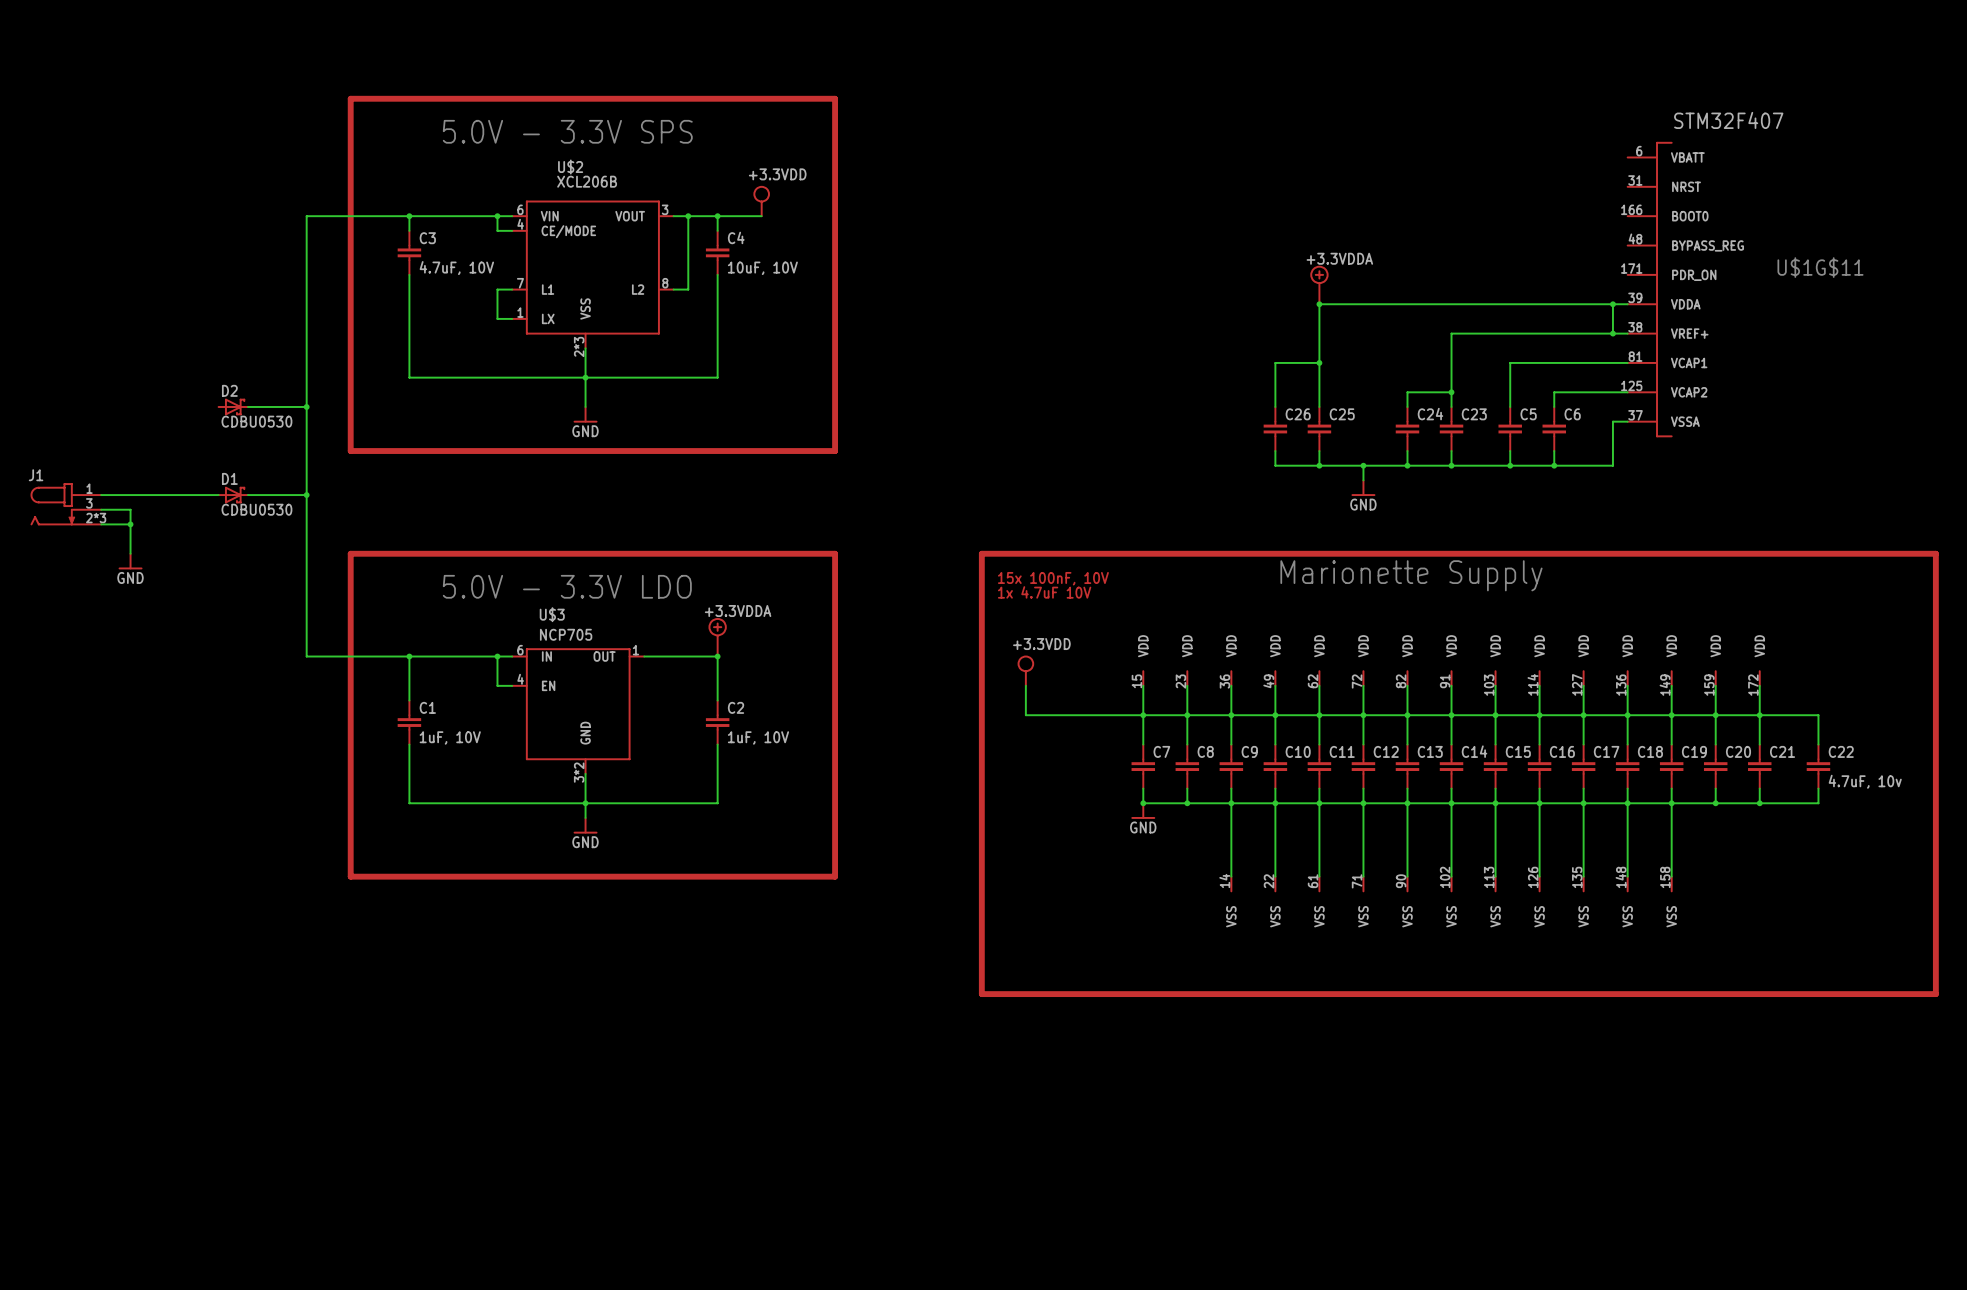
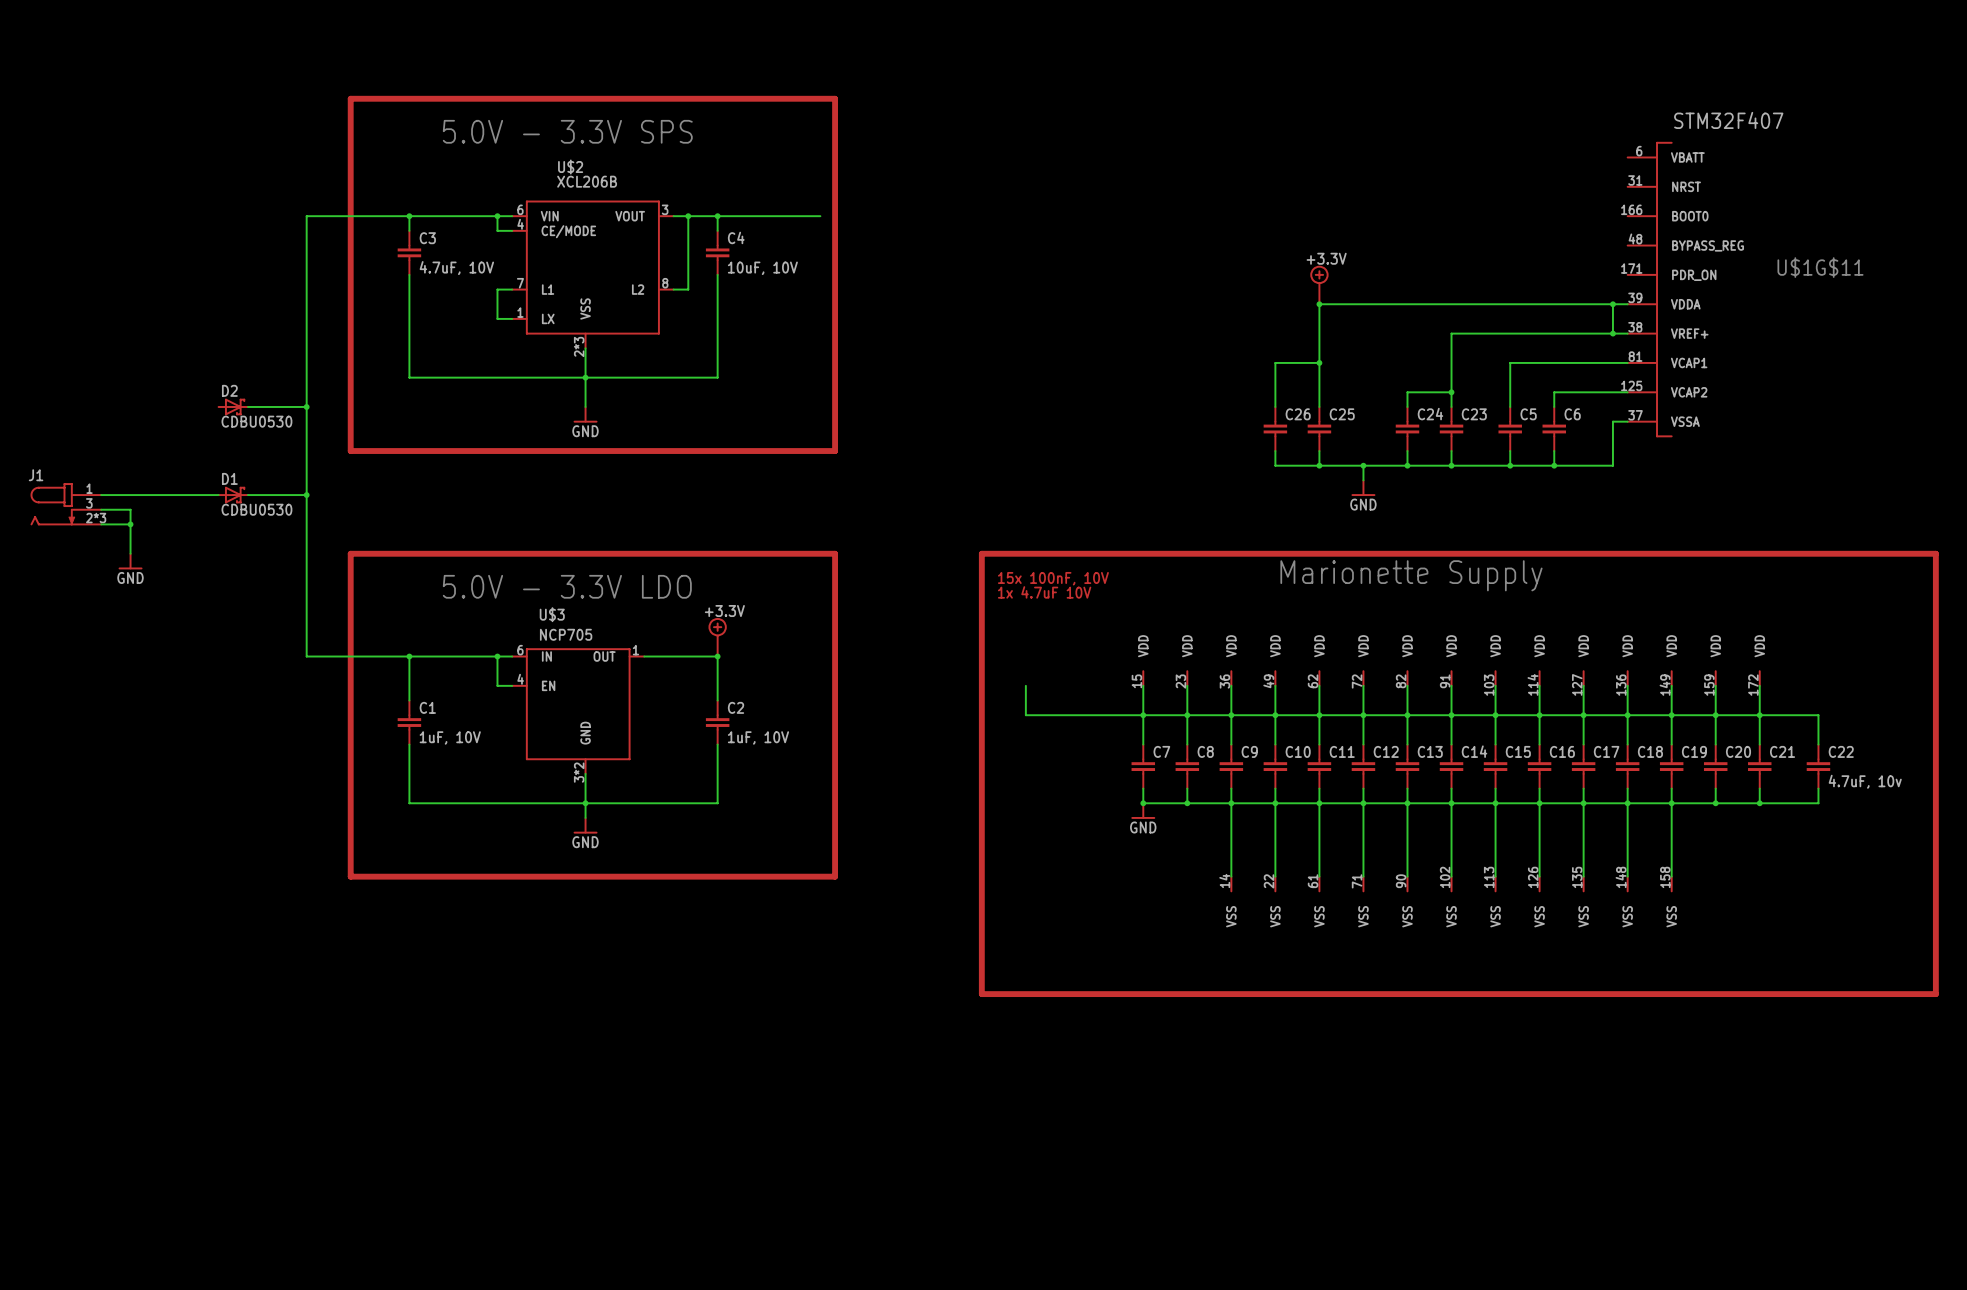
power symbol: +3.3VDD (761, 201) -> none
wire: none -> (761, 216) (820, 216)
power symbol: +3.3VDDA (1319, 285) -> +3.3V (1319, 285)
power symbol: +3.3VDDA (717, 637) -> +3.3V (717, 637)
power symbol: +3.3VDD (1025, 671) -> none

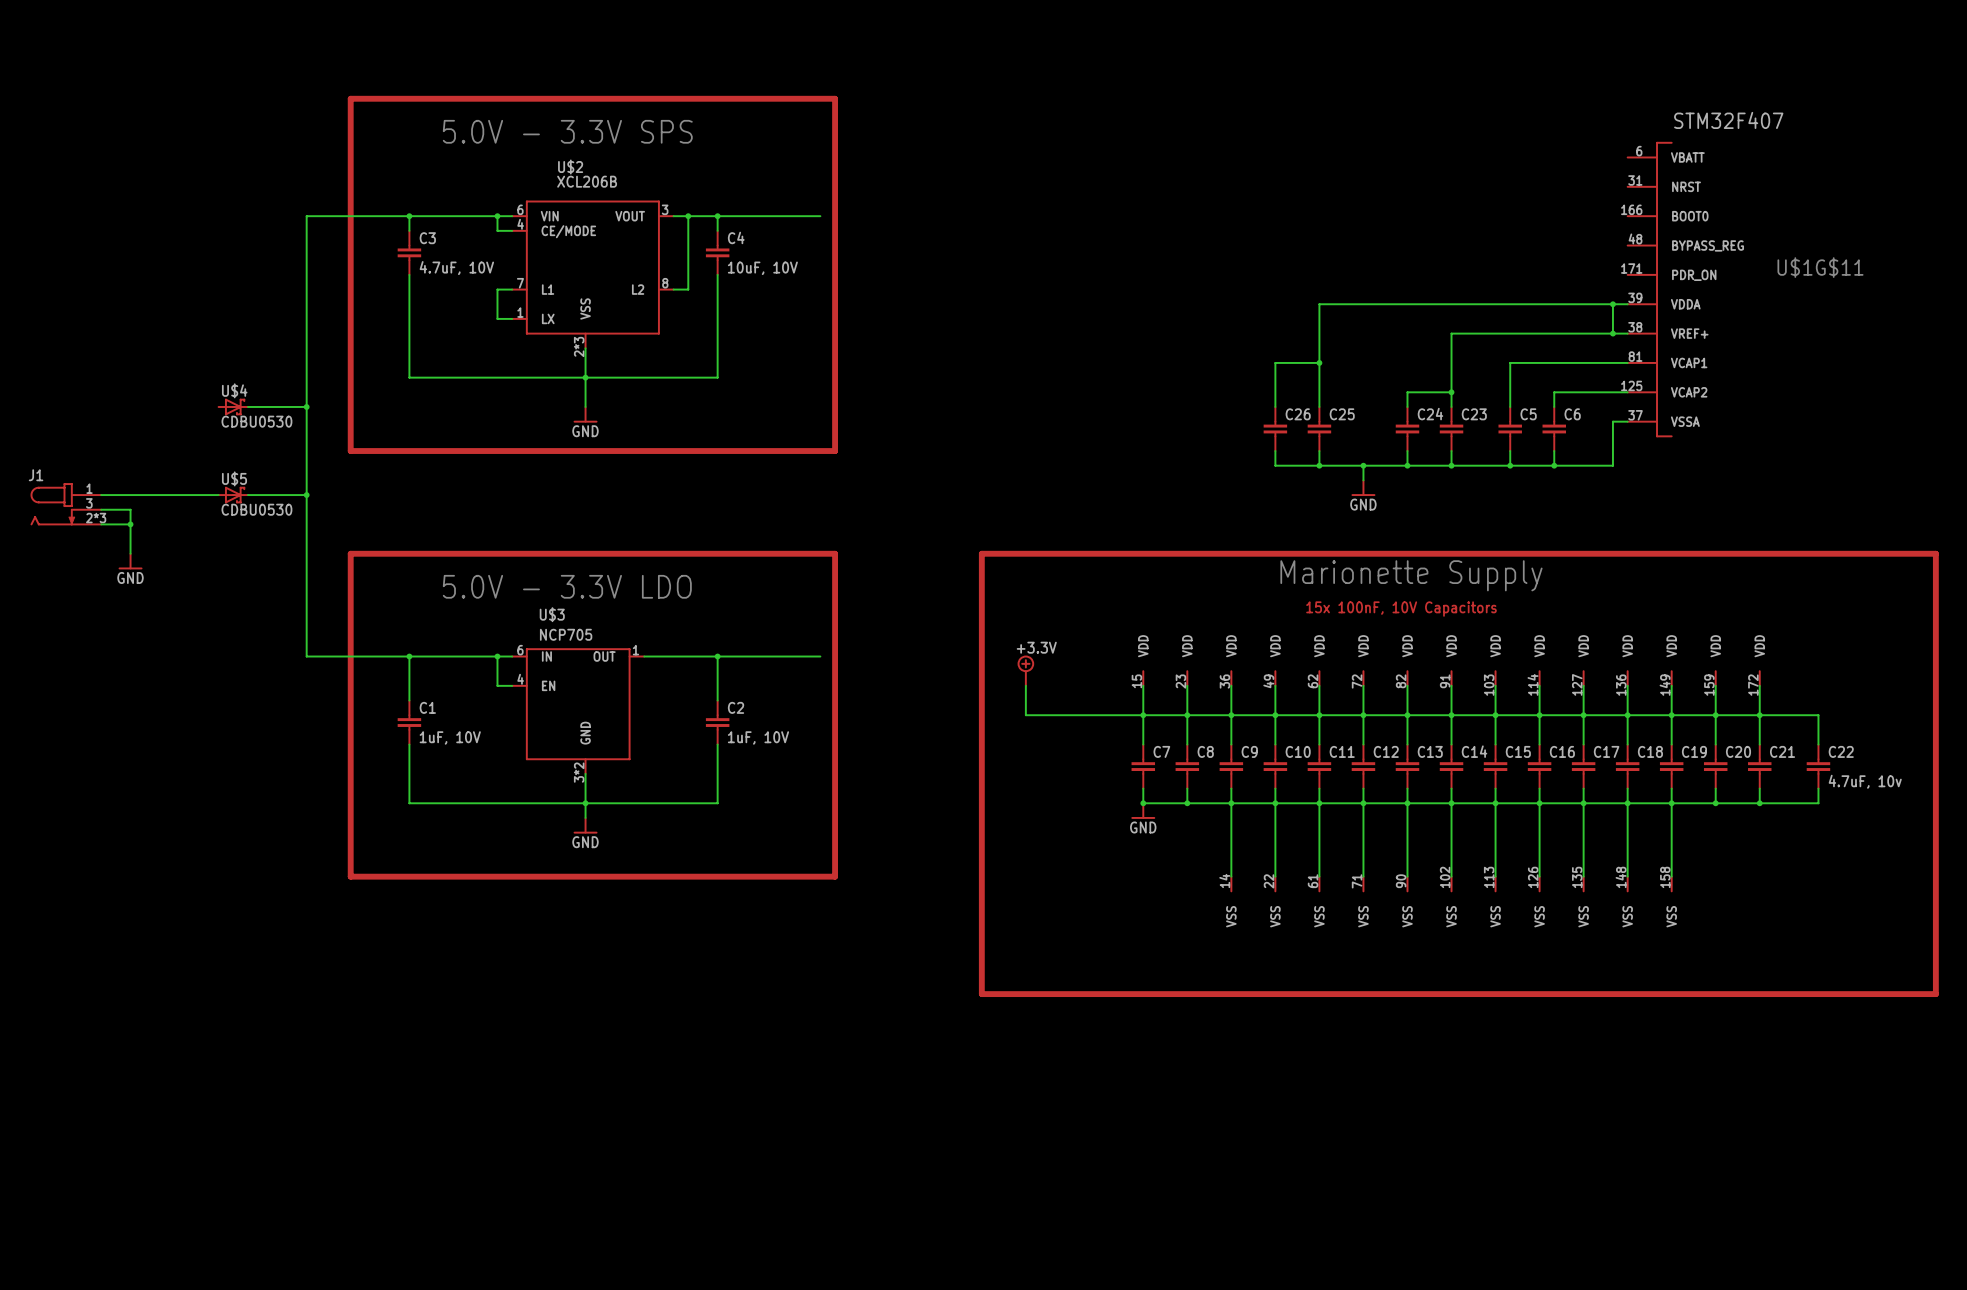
power symbol: +3.3V (1319, 285) -> none
junction: (1319, 304) -> none
D2 name: D2 (229, 390) -> U$4 (234, 390)
D1 name: D1 (229, 478) -> U$5 (234, 478)
text: 15x 100nF, 10V (1053, 578) -> none
text: 1x 4.7uF 10V (1044, 592) -> none
text: none -> 15x 100nF, 10V Capacitors (1401, 609)
power symbol: +3.3V (717, 637) -> none
wire: none -> (717, 656) (820, 656)
power symbol: none -> +3.3V (1025, 670)

